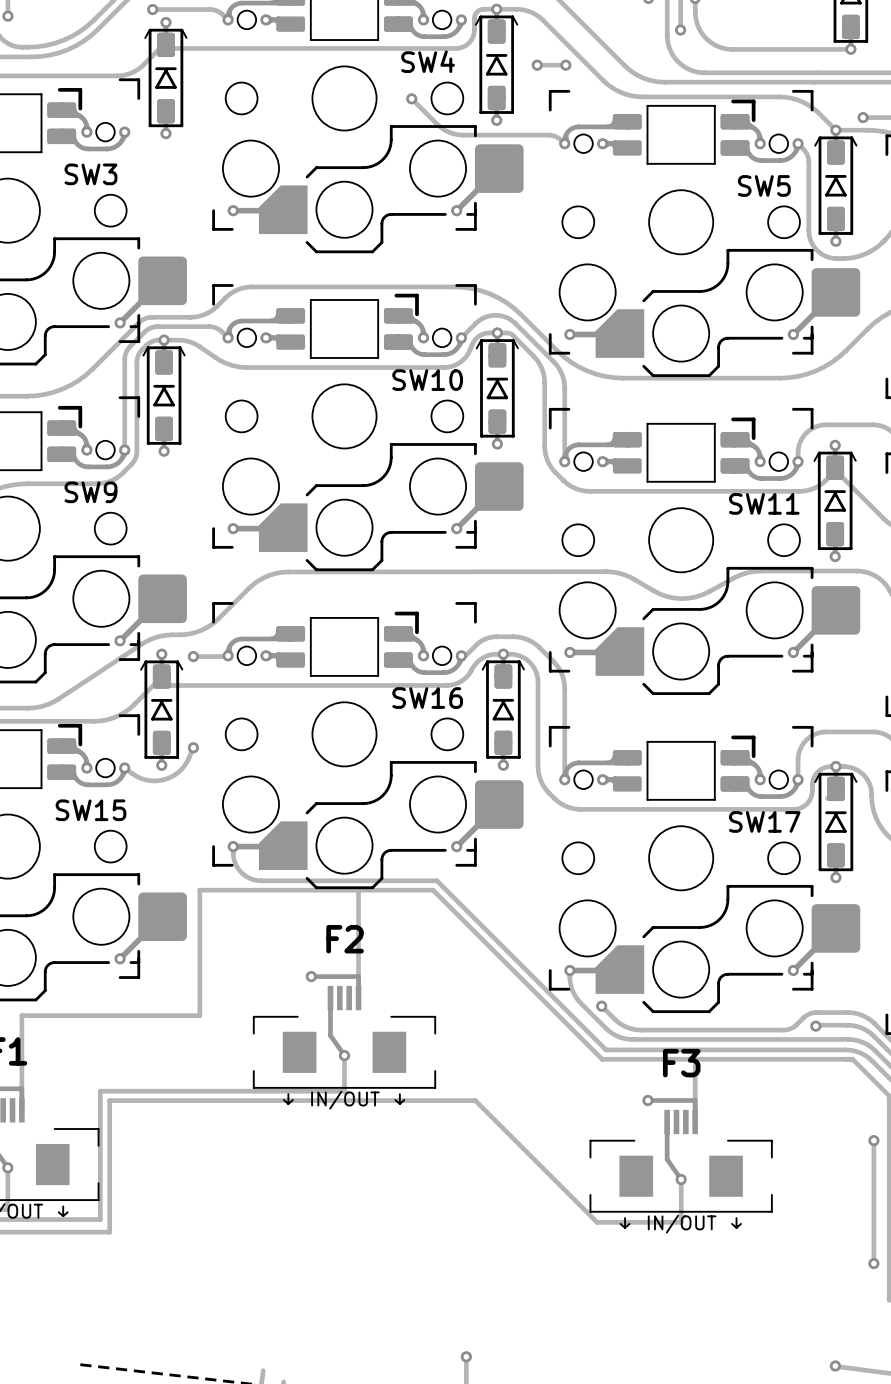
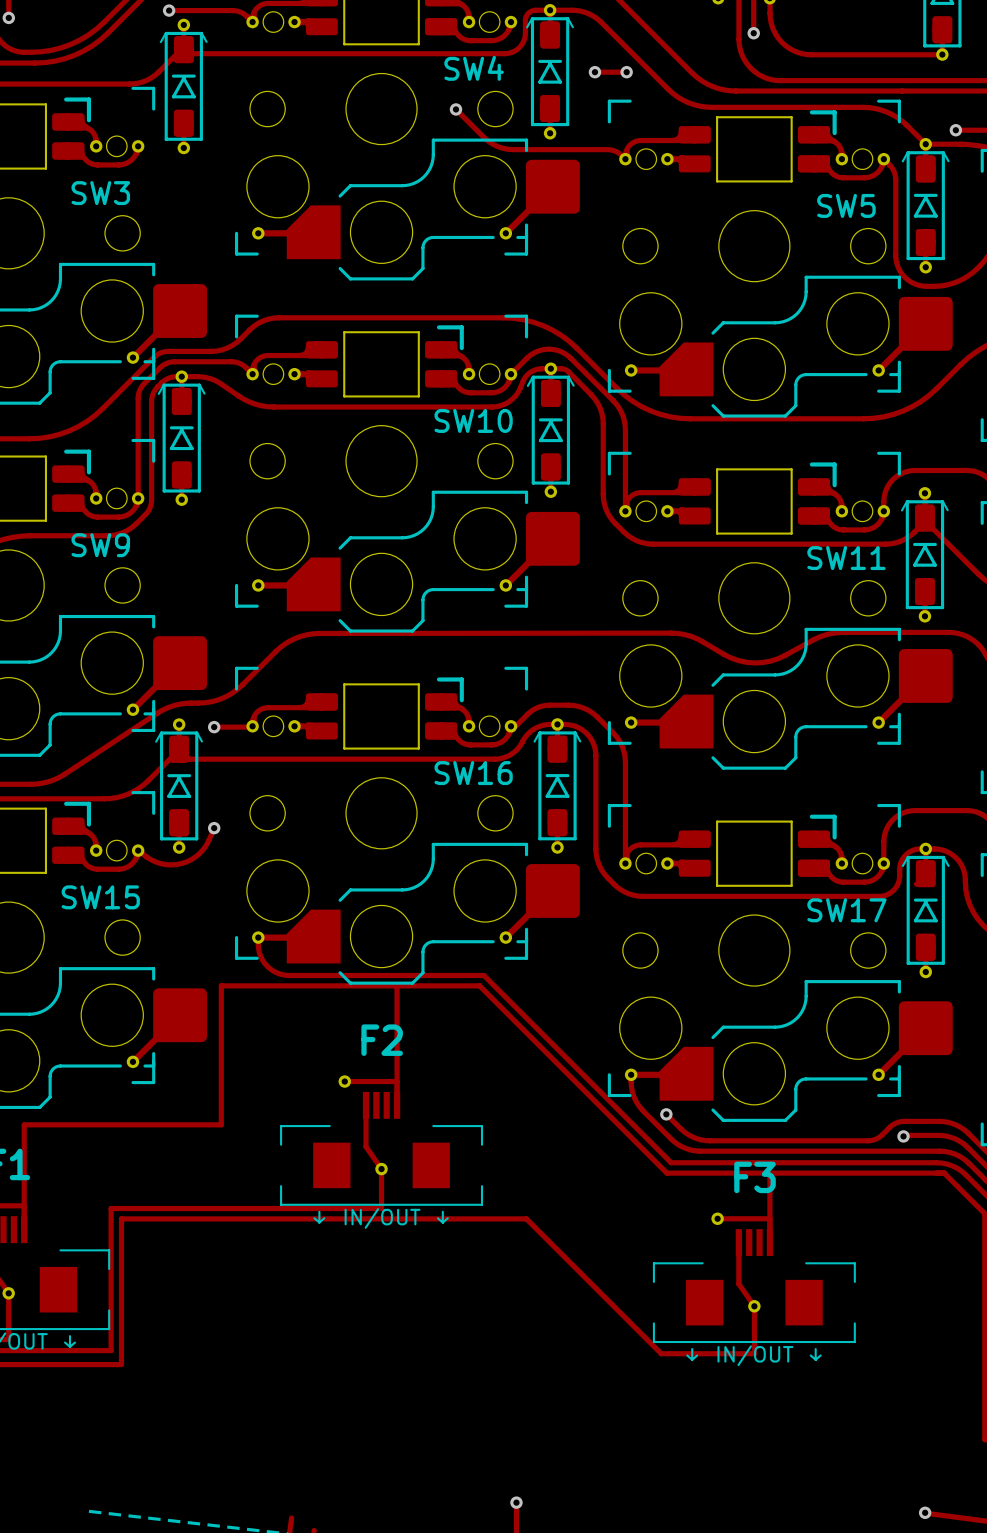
track: (873, 1140) (873, 1263) -> none
via: (873, 1140) -> none
via: (873, 1263) -> none

